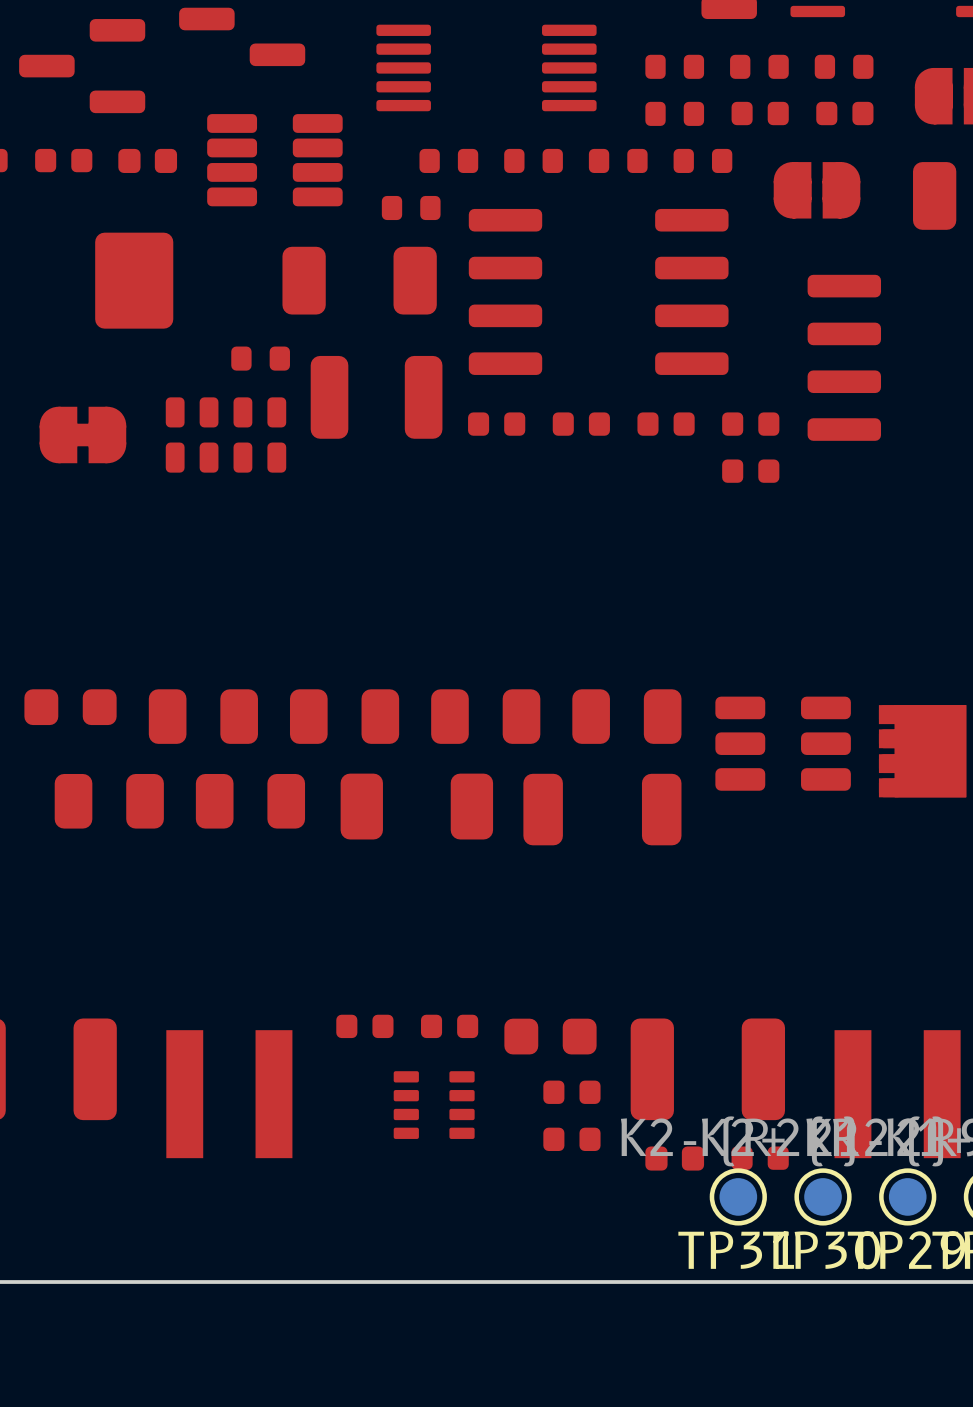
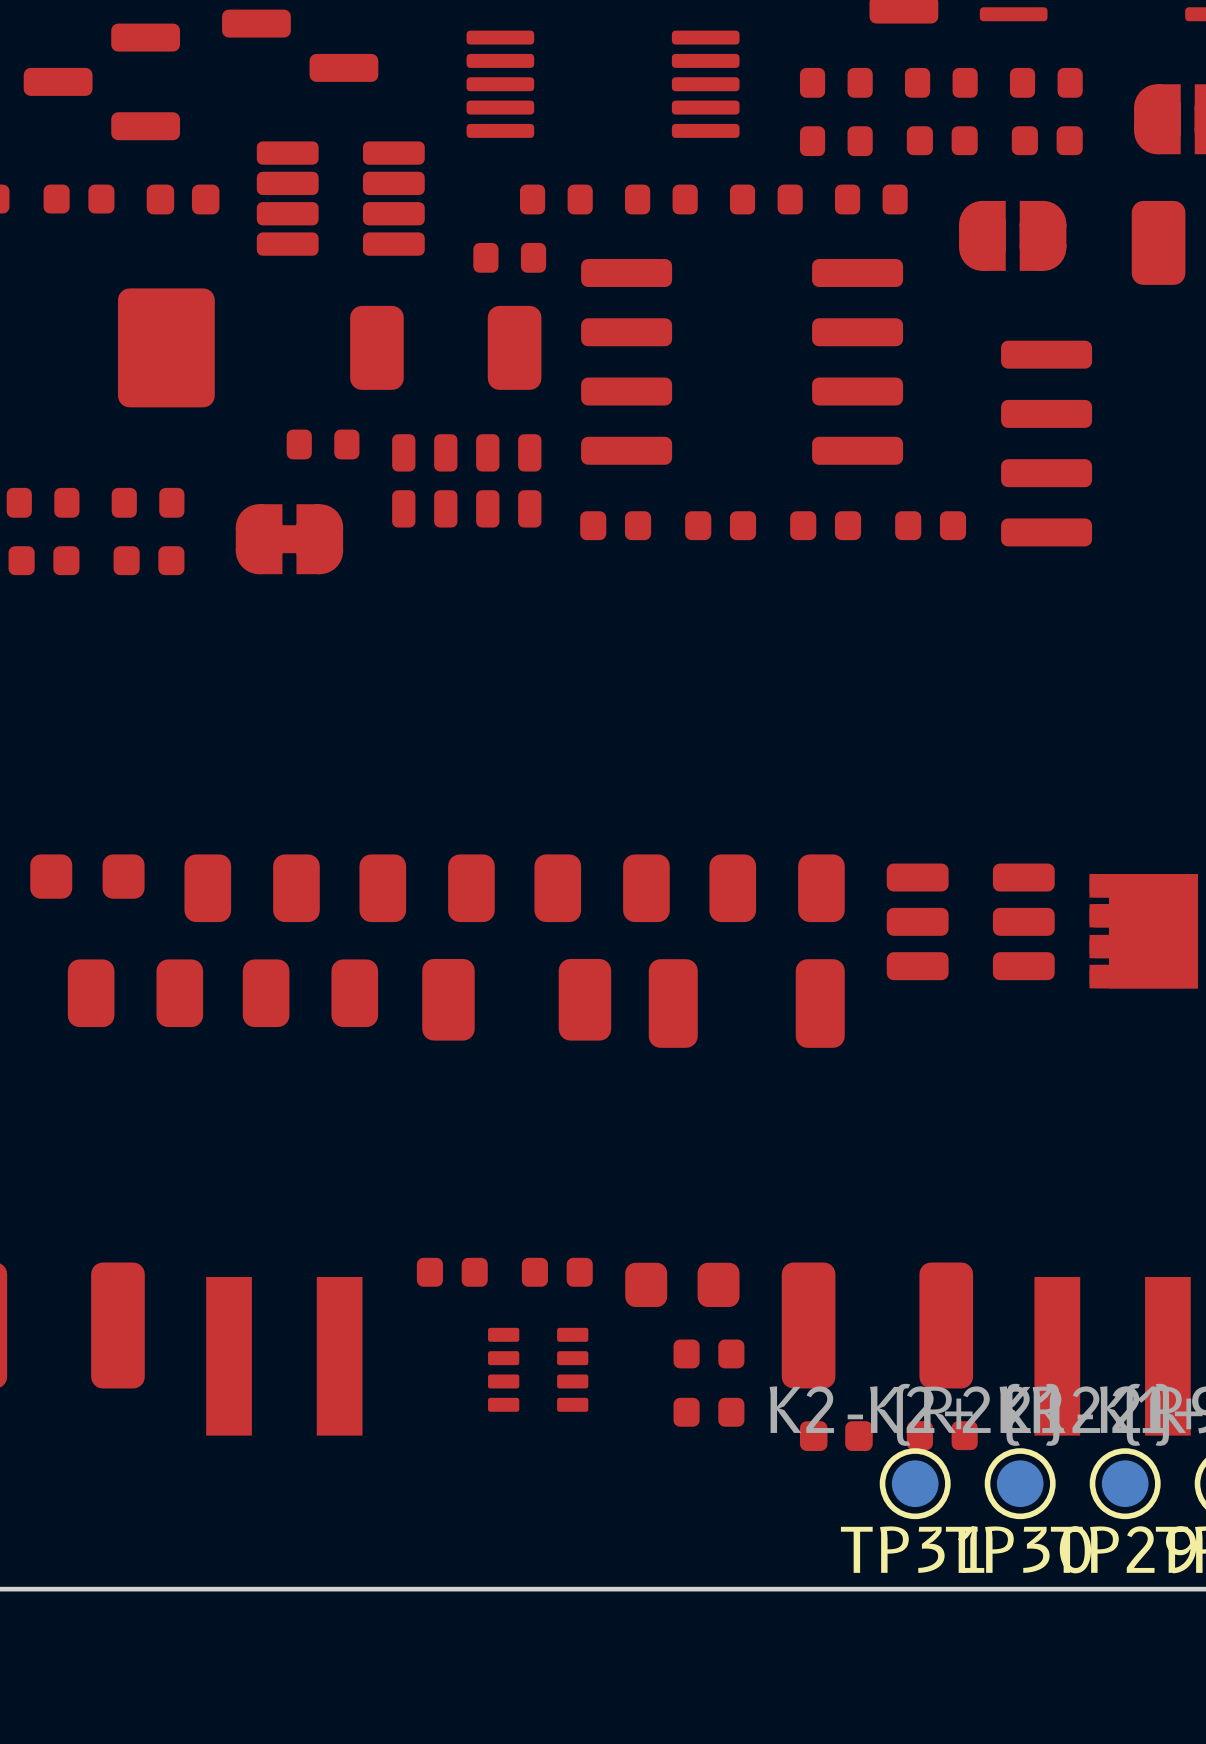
part footprint: [310, 355, 443, 439] -> [392, 434, 542, 528]
part footprint: [165, 397, 287, 473] -> [235, 504, 344, 575]
part: none -> (43, 502)
part: none -> (148, 502)
part: (82, 434) -> none
part: none -> (44, 560)
part: none -> (149, 560)
part: (750, 471) -> none

